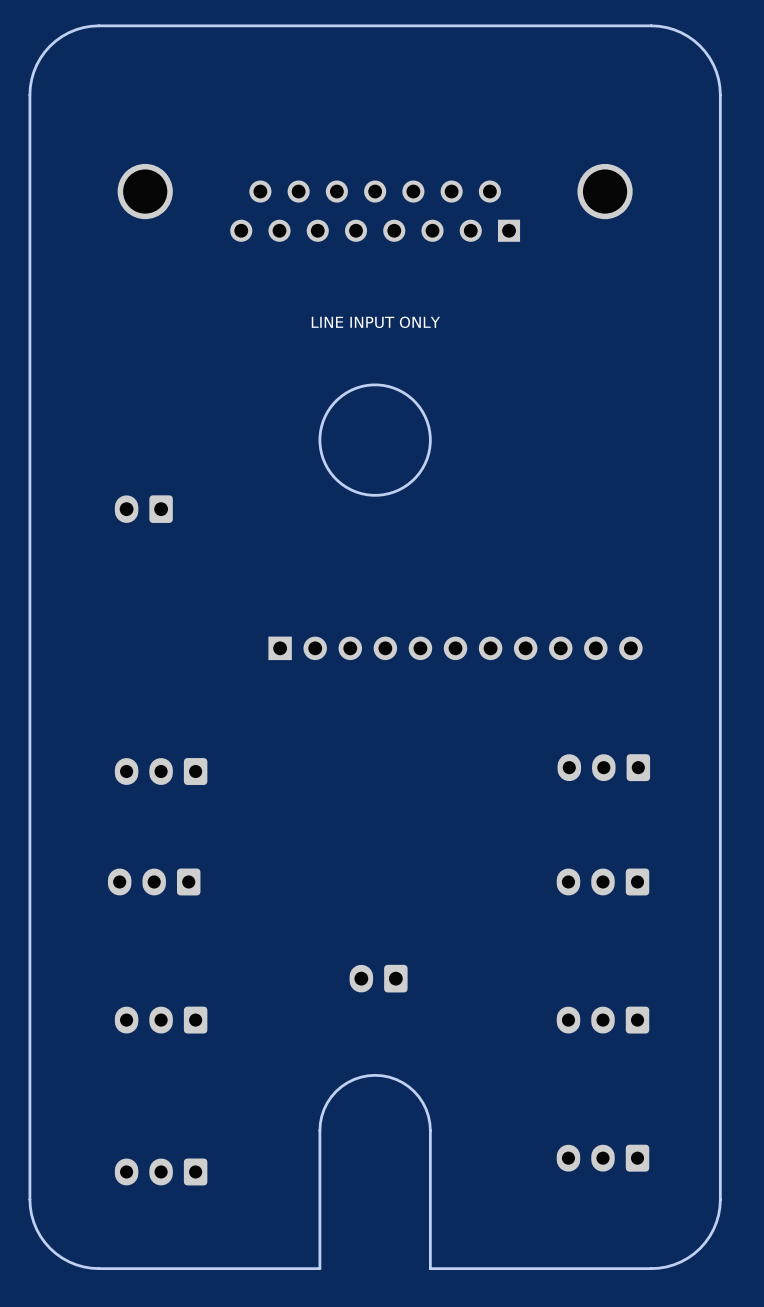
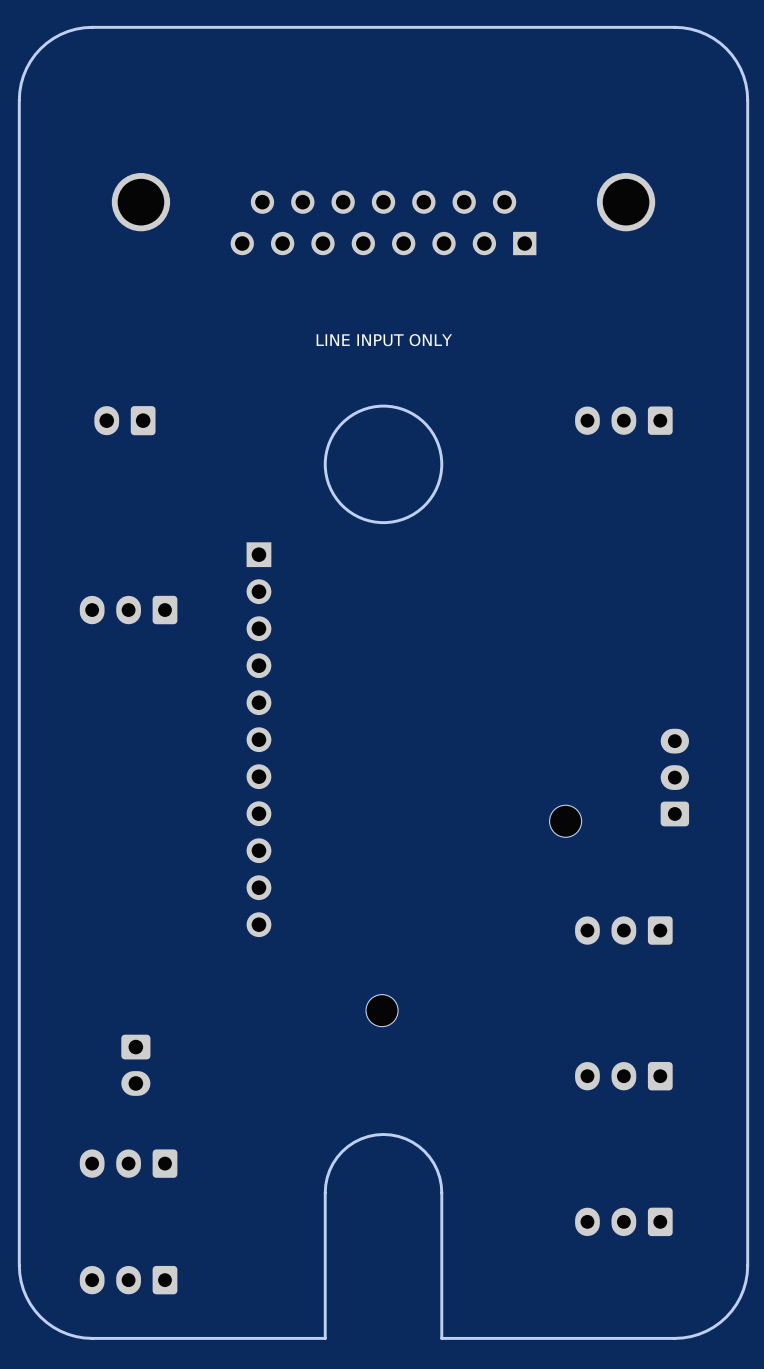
part: none -> (623, 420)
part position: (143, 509) -> (124, 420)
part: none -> (128, 610)
part rotation: 0° (455, 648) -> 90° clockwise (258, 739)
part rotation: 0° (603, 767) -> 90° clockwise (674, 777)
part position: (603, 767) -> (674, 777)
part: (161, 771) -> none
part: none -> (565, 821)
part: (154, 881) -> none
part: none -> (382, 1010)
part rotation: 0° (378, 978) -> 90° counterclockwise (135, 1065)
part position: (378, 978) -> (135, 1065)
part: (161, 1020) -> none
part: none -> (128, 1163)
part: (161, 1171) -> none
part: none -> (128, 1280)

